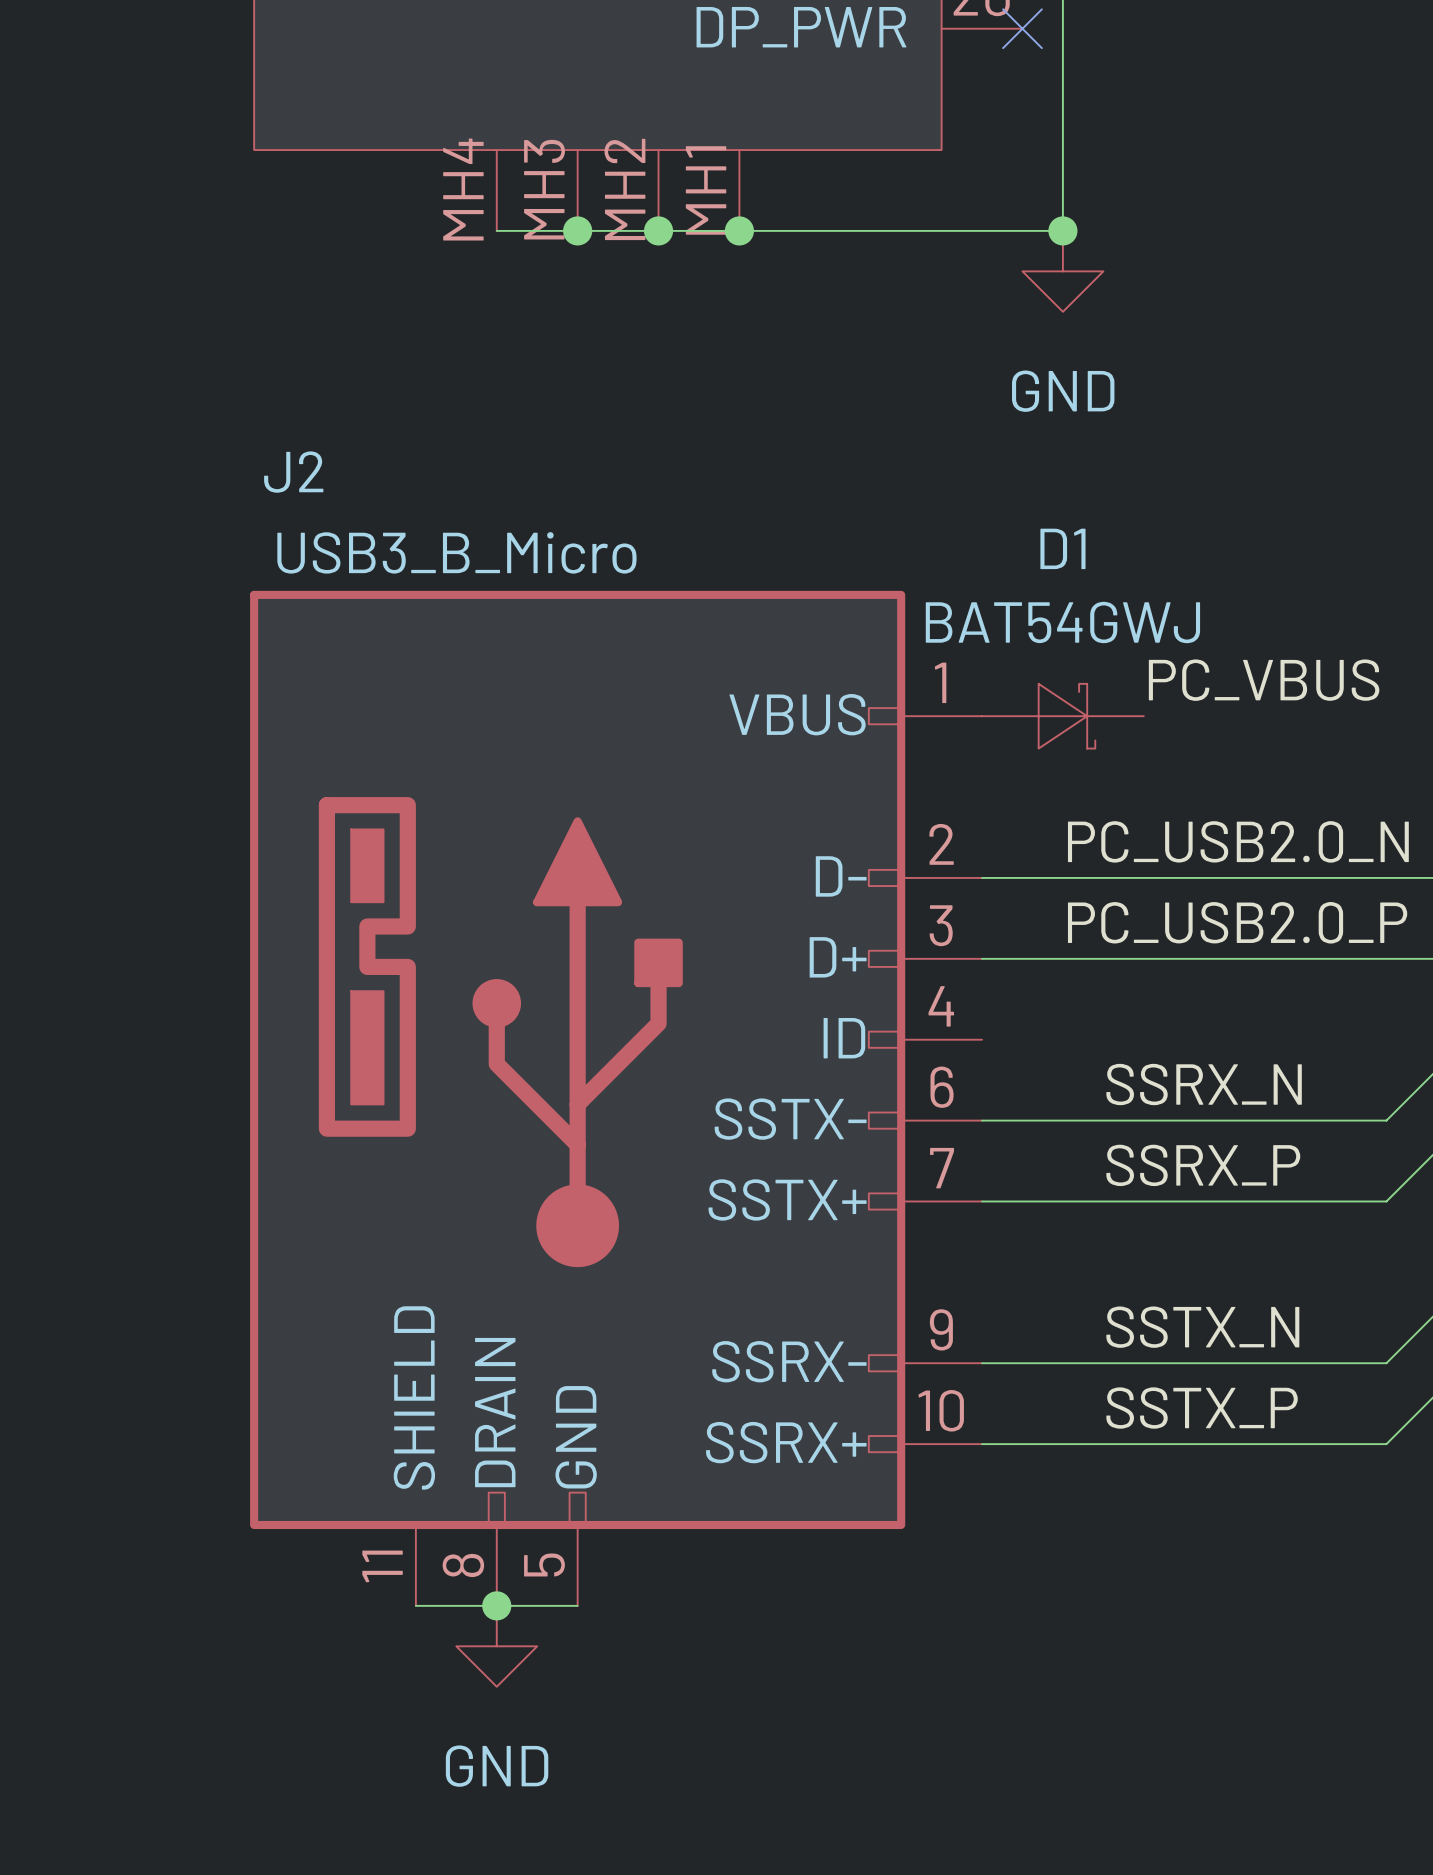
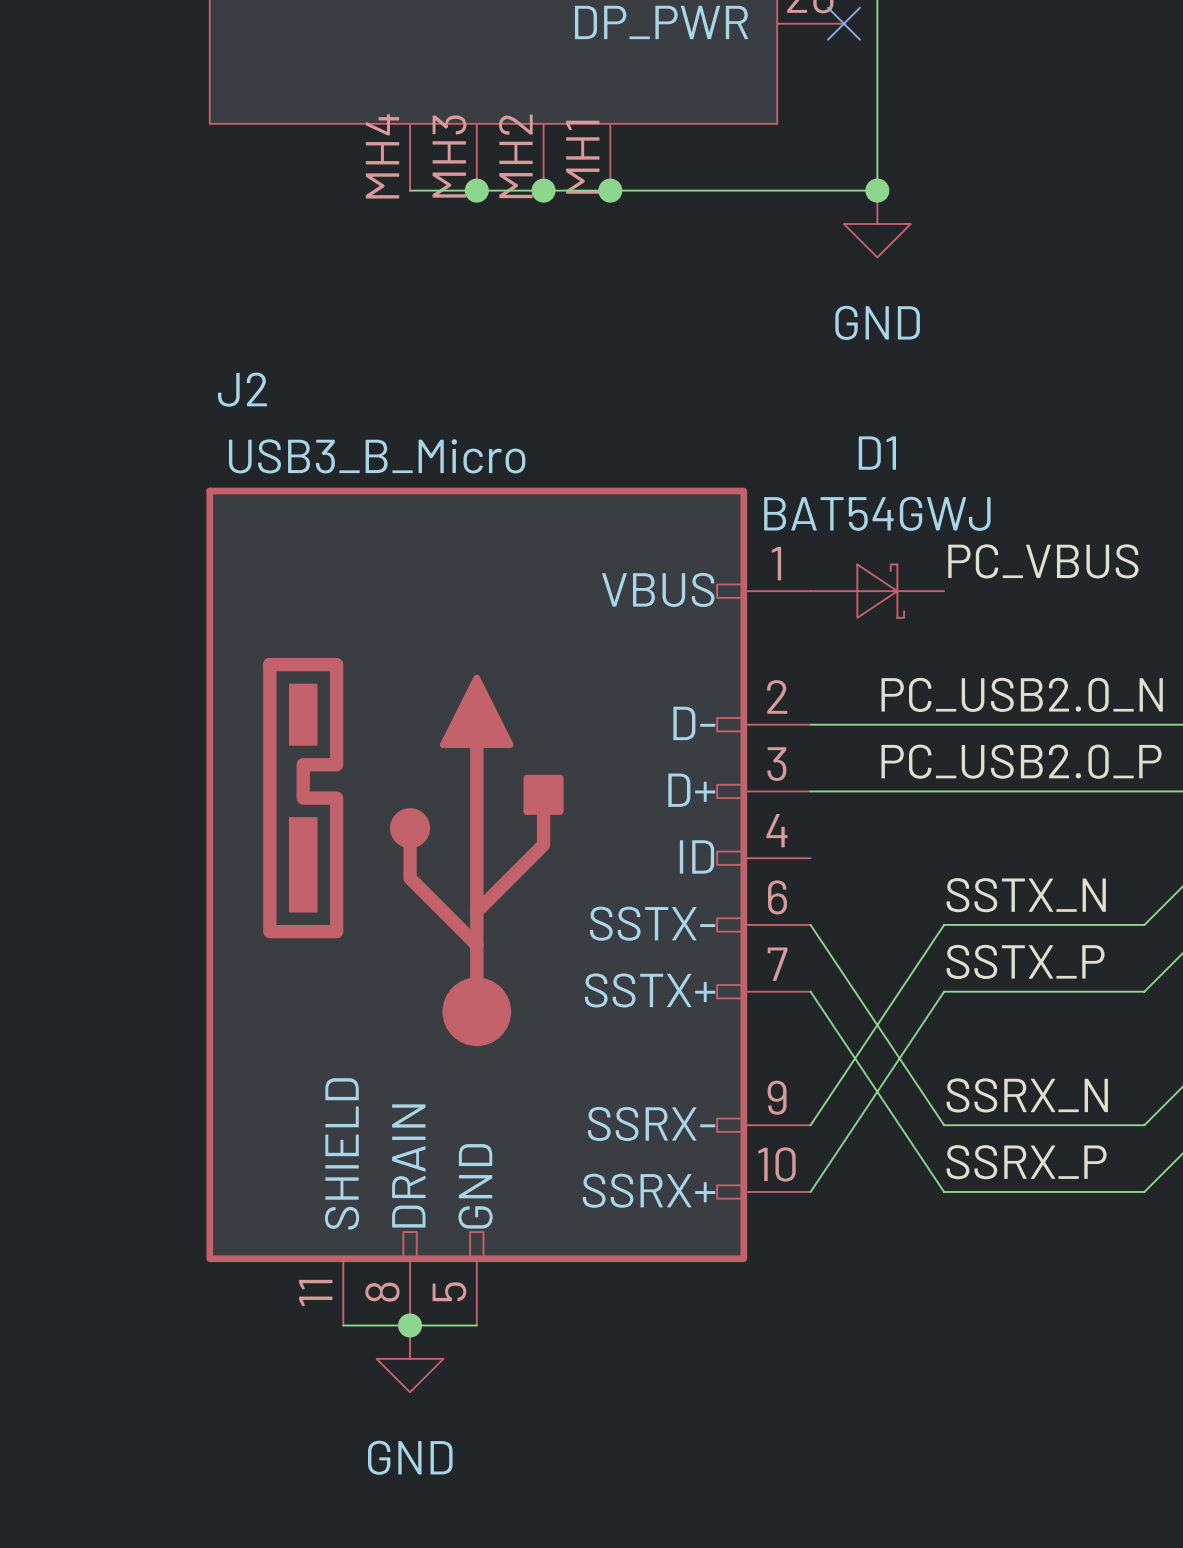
label position: SSRX_N (1204, 1084) -> SSRX_N (1027, 1095)
wire: (982, 1120) (1143, 1120) -> (810, 924) (944, 1125)
label position: SSRX_P (1203, 1165) -> SSRX_P (1026, 1162)
wire: (982, 1201) (1143, 1201) -> (810, 991) (944, 1191)
label position: SSTX_N (1202, 1327) -> SSTX_N (1026, 895)
wire: (982, 1363) (1143, 1363) -> (810, 1125) (944, 924)
label position: SSTX_P (1202, 1408) -> SSTX_P (1025, 961)
wire: (982, 1444) (1143, 1444) -> (810, 1191) (944, 991)

